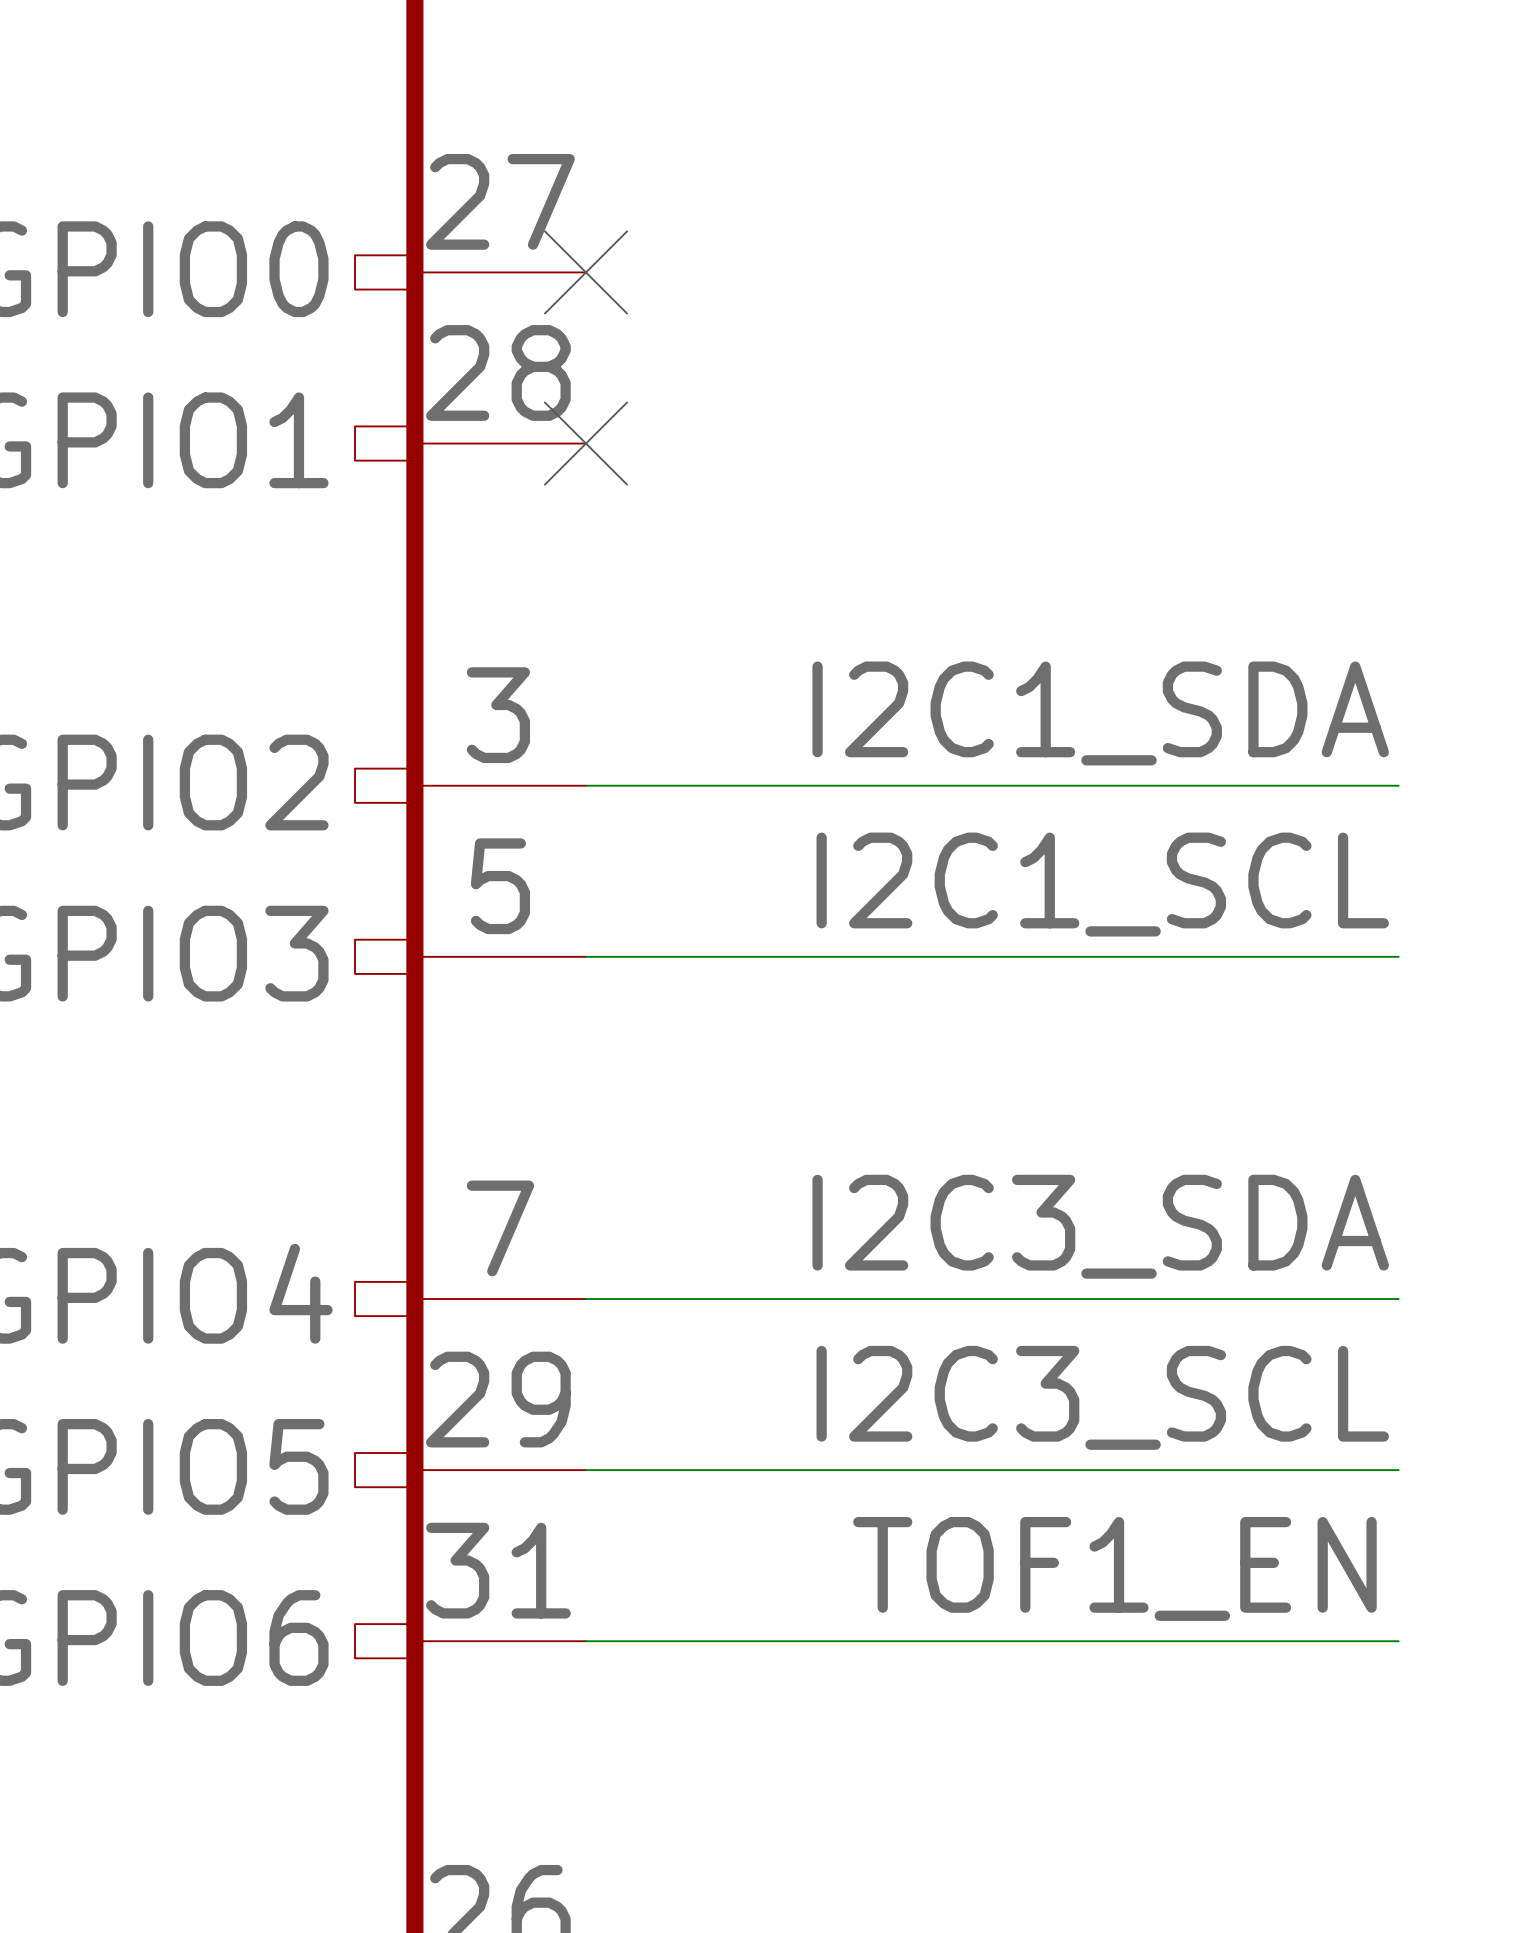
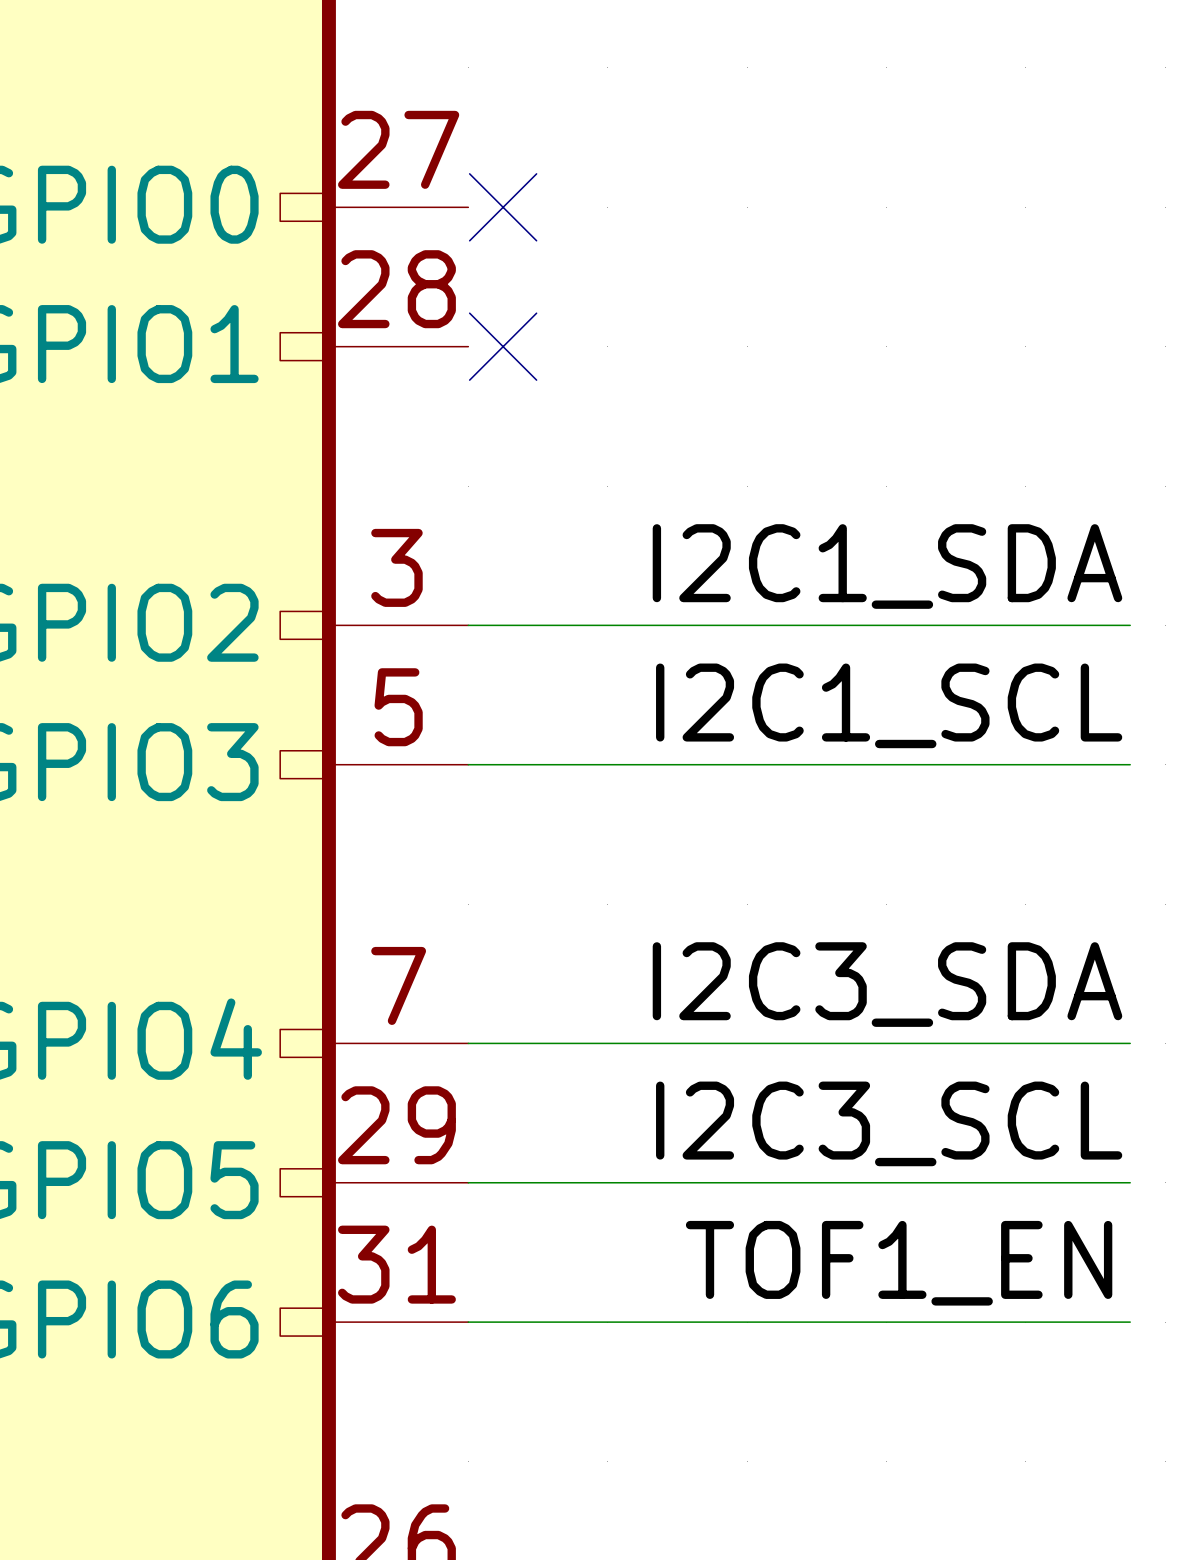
no-connect mark position: (585, 272) -> (503, 207)
no-connect mark position: (585, 443) -> (503, 346)

